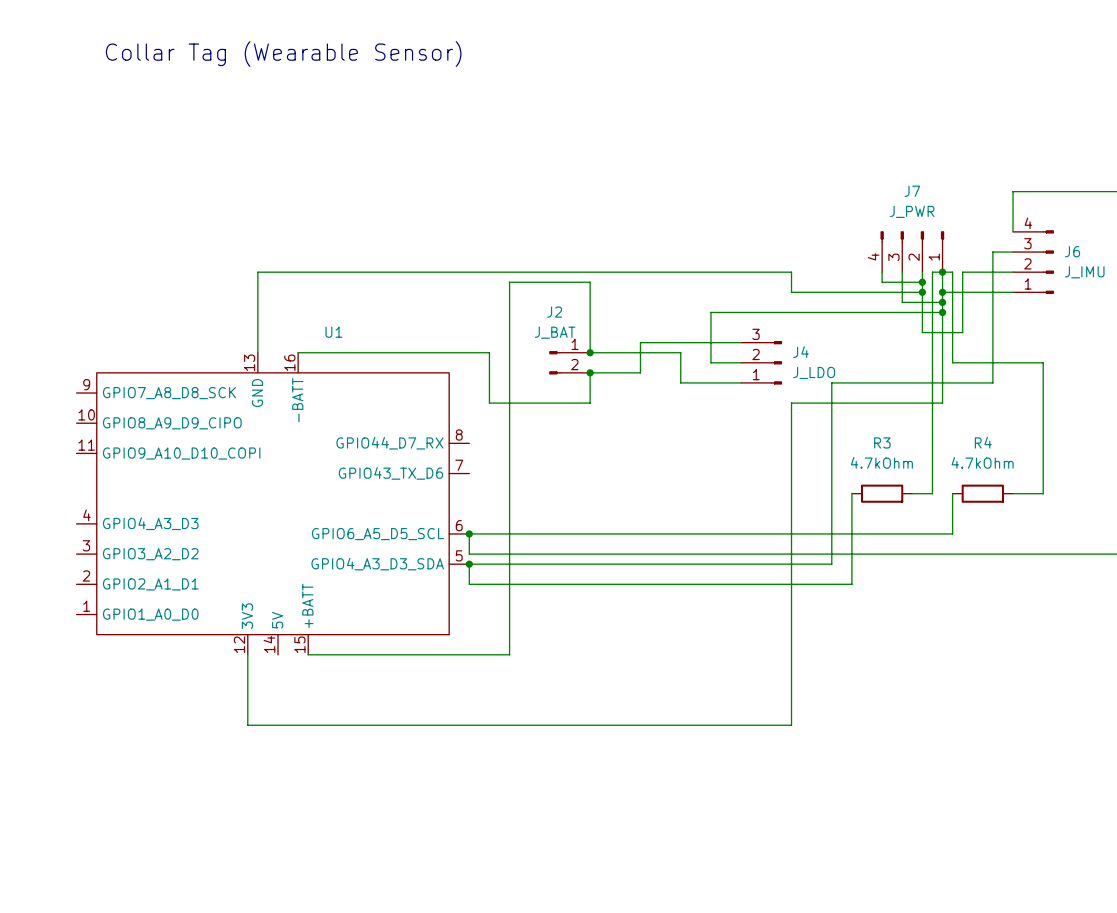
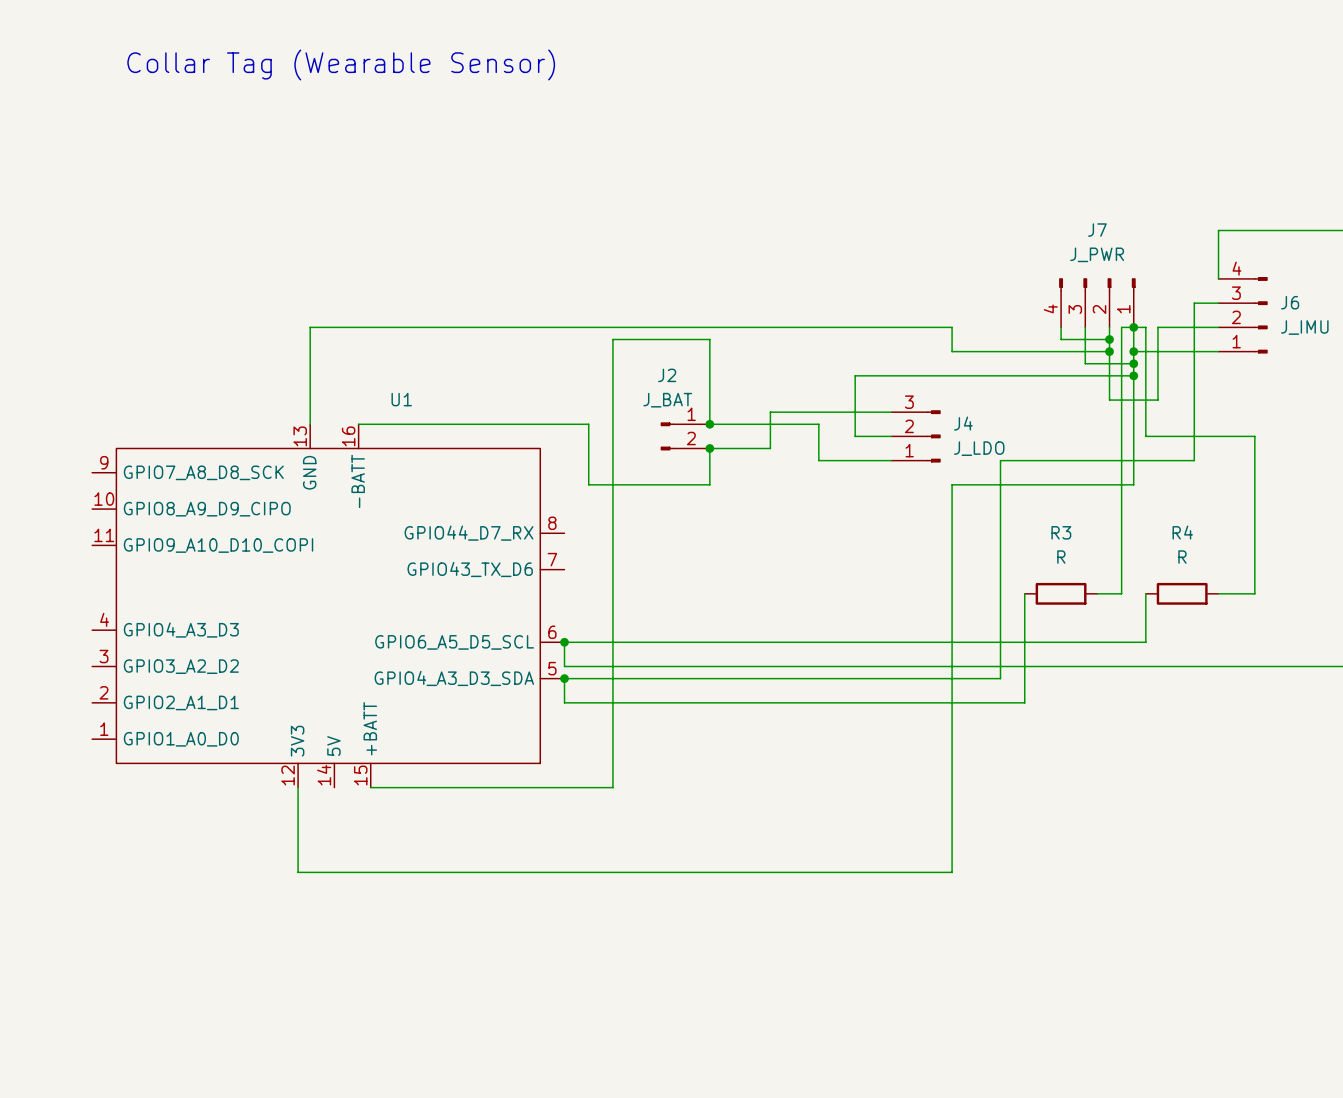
R3 value: 4.7kOhm (881, 462) -> R (1061, 557)
R4 value: 4.7kOhm (982, 462) -> R (1182, 557)

